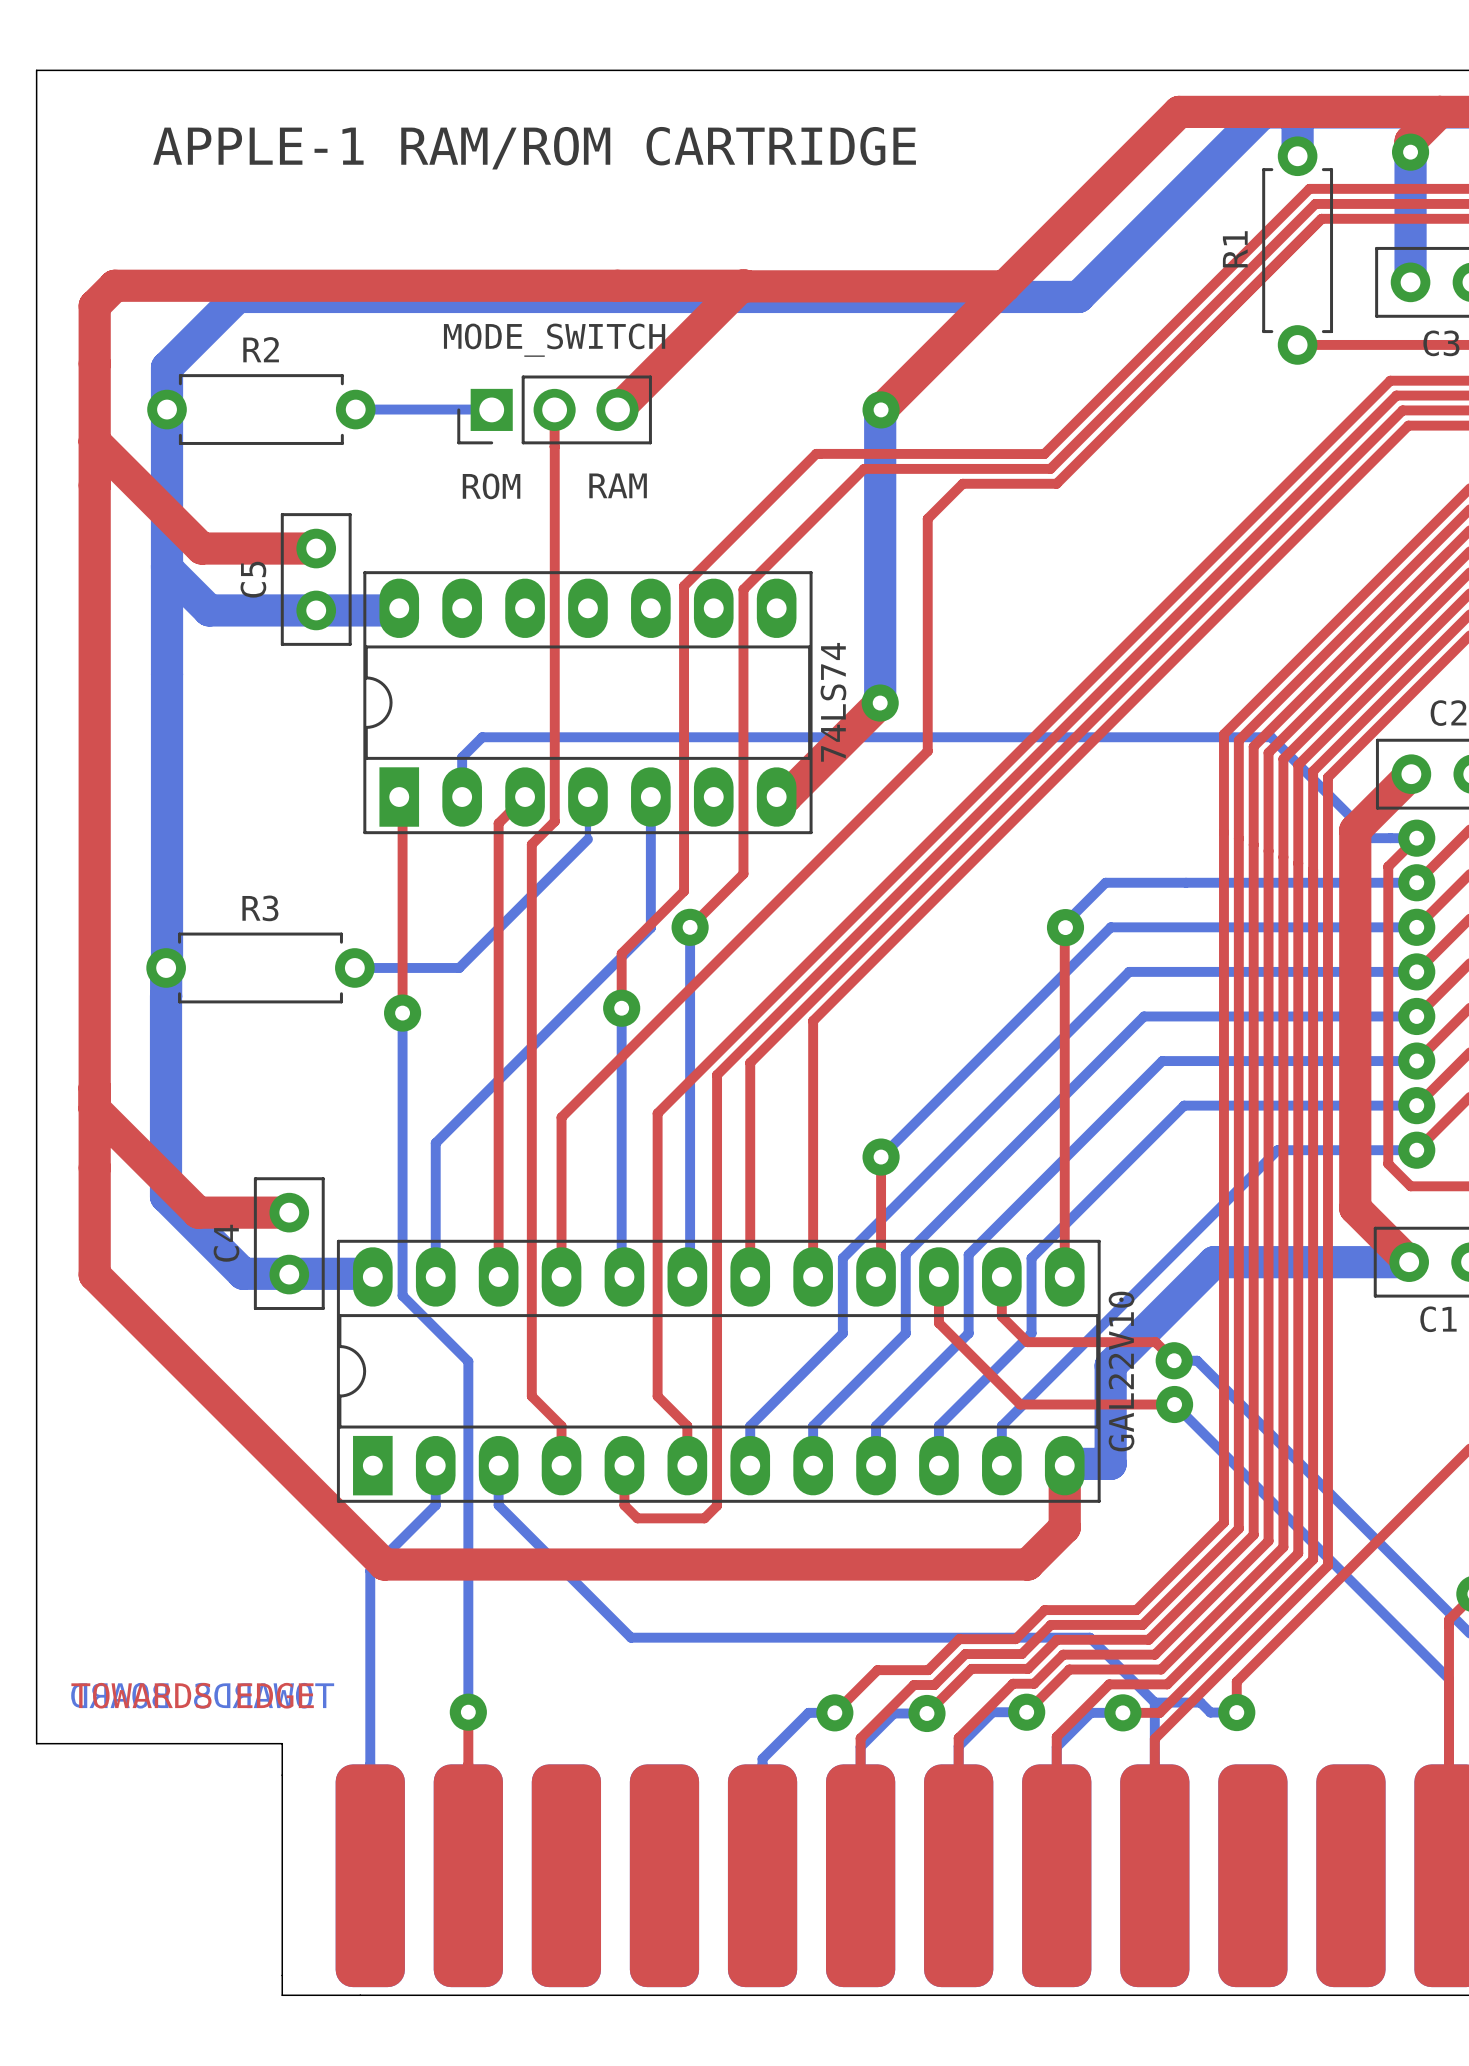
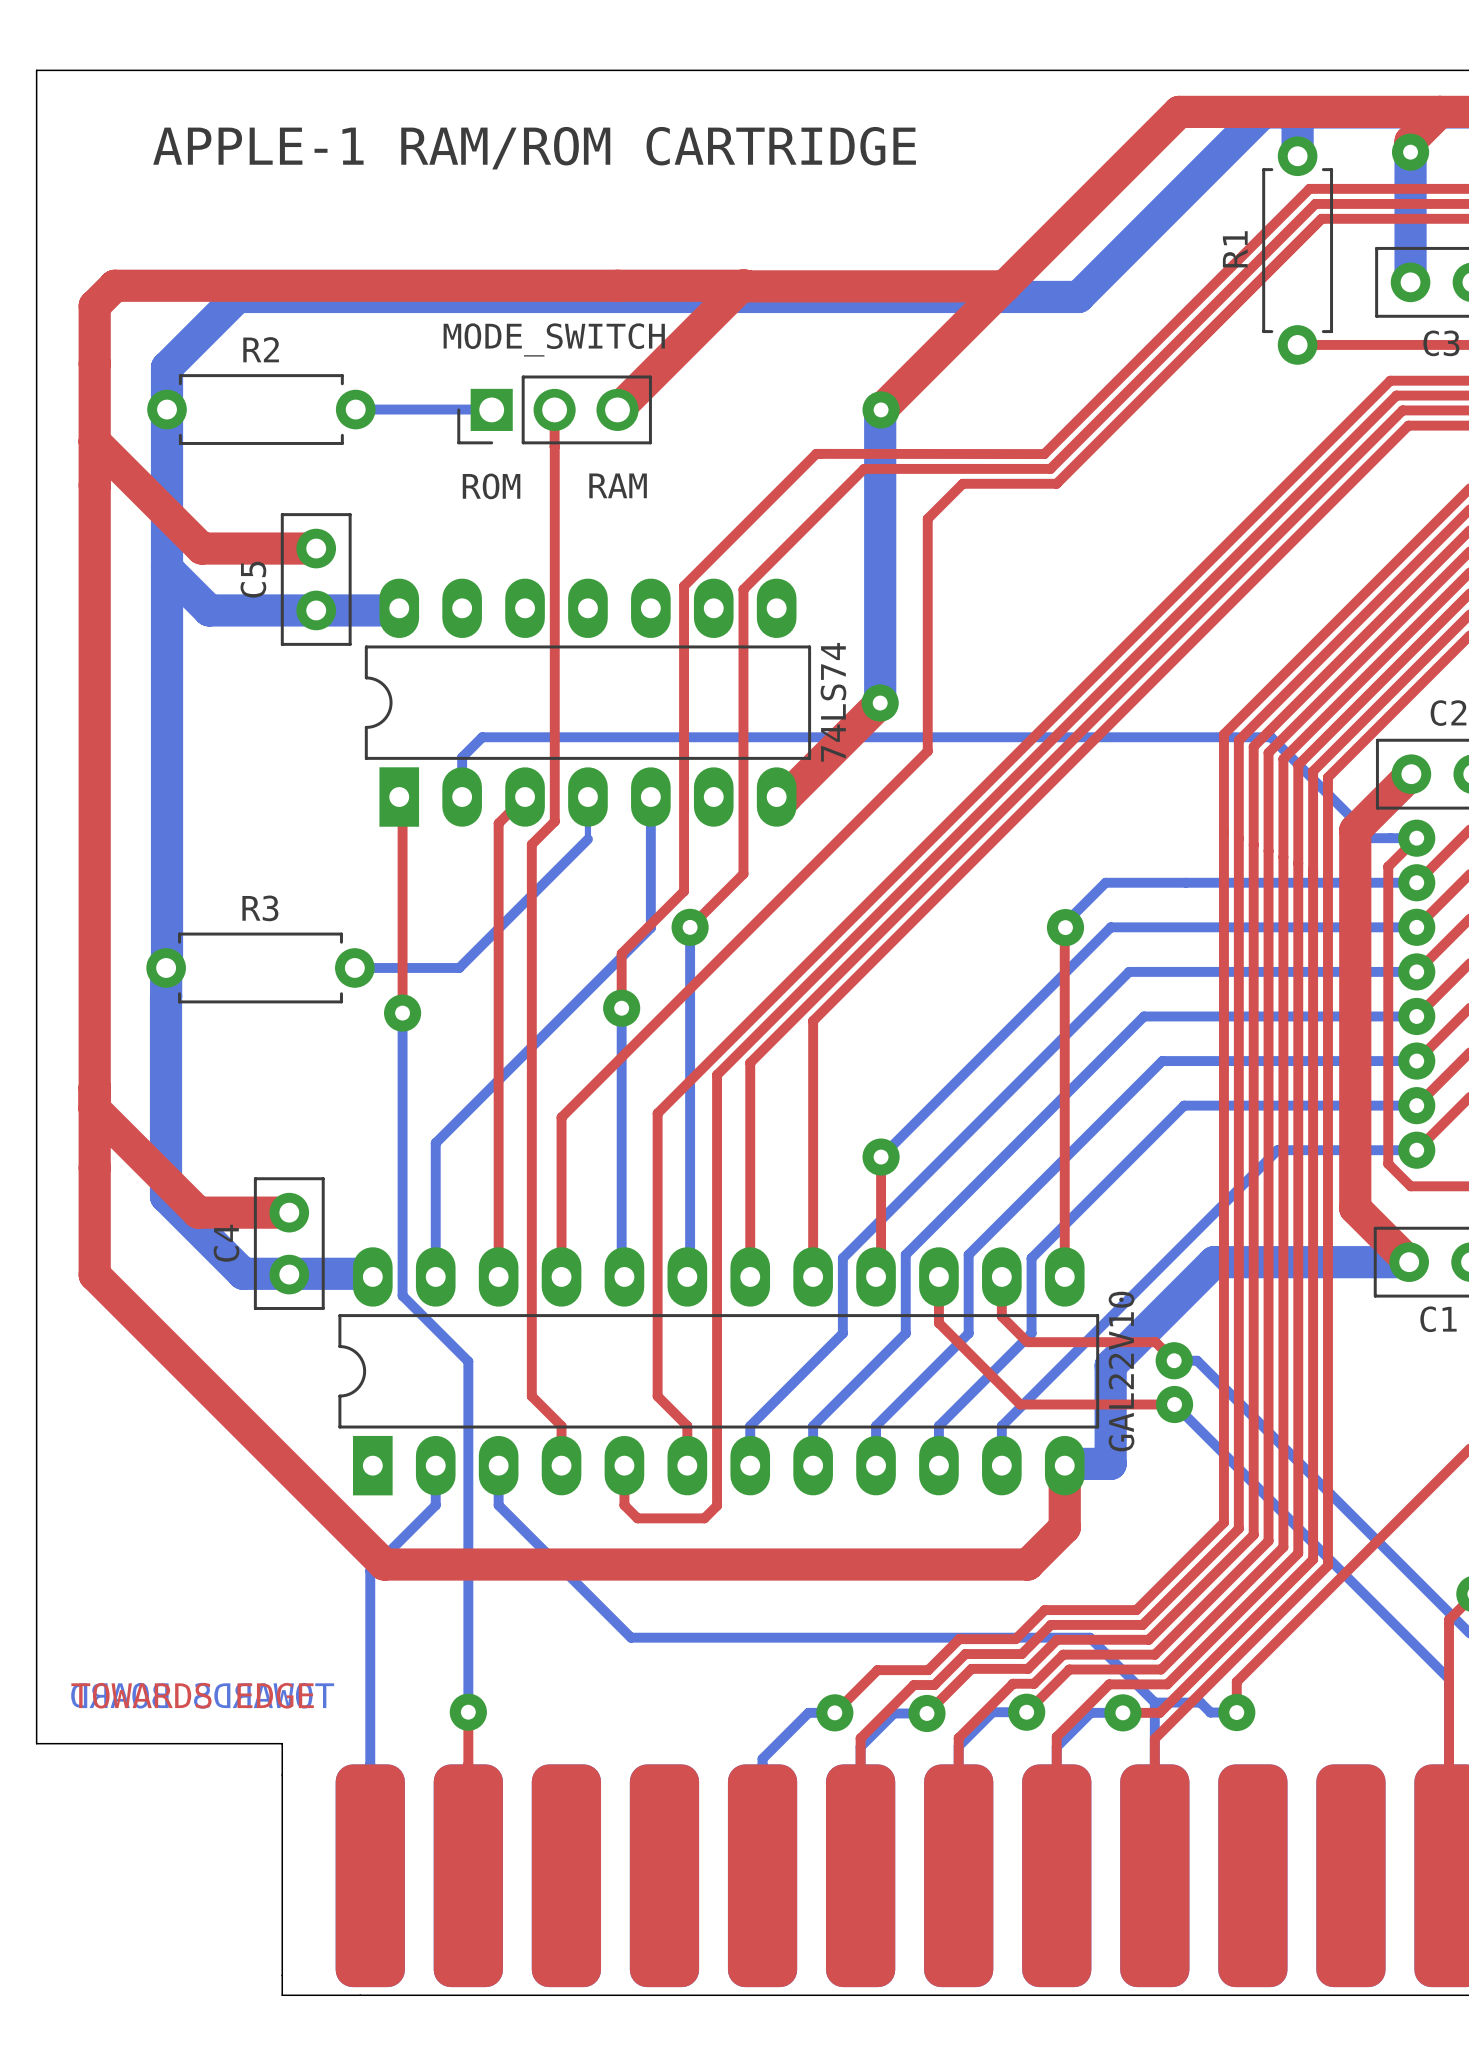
MODE_SWITCH value: none -> MODE_SWITCH (554, 339)
MODE_SWITCH name: MODE_SWITCH (554, 340) -> none
part footprint: [363, 571, 813, 835] -> [364, 578, 812, 827]
part footprint: [336, 1239, 1101, 1503] -> [338, 1247, 1100, 1496]

